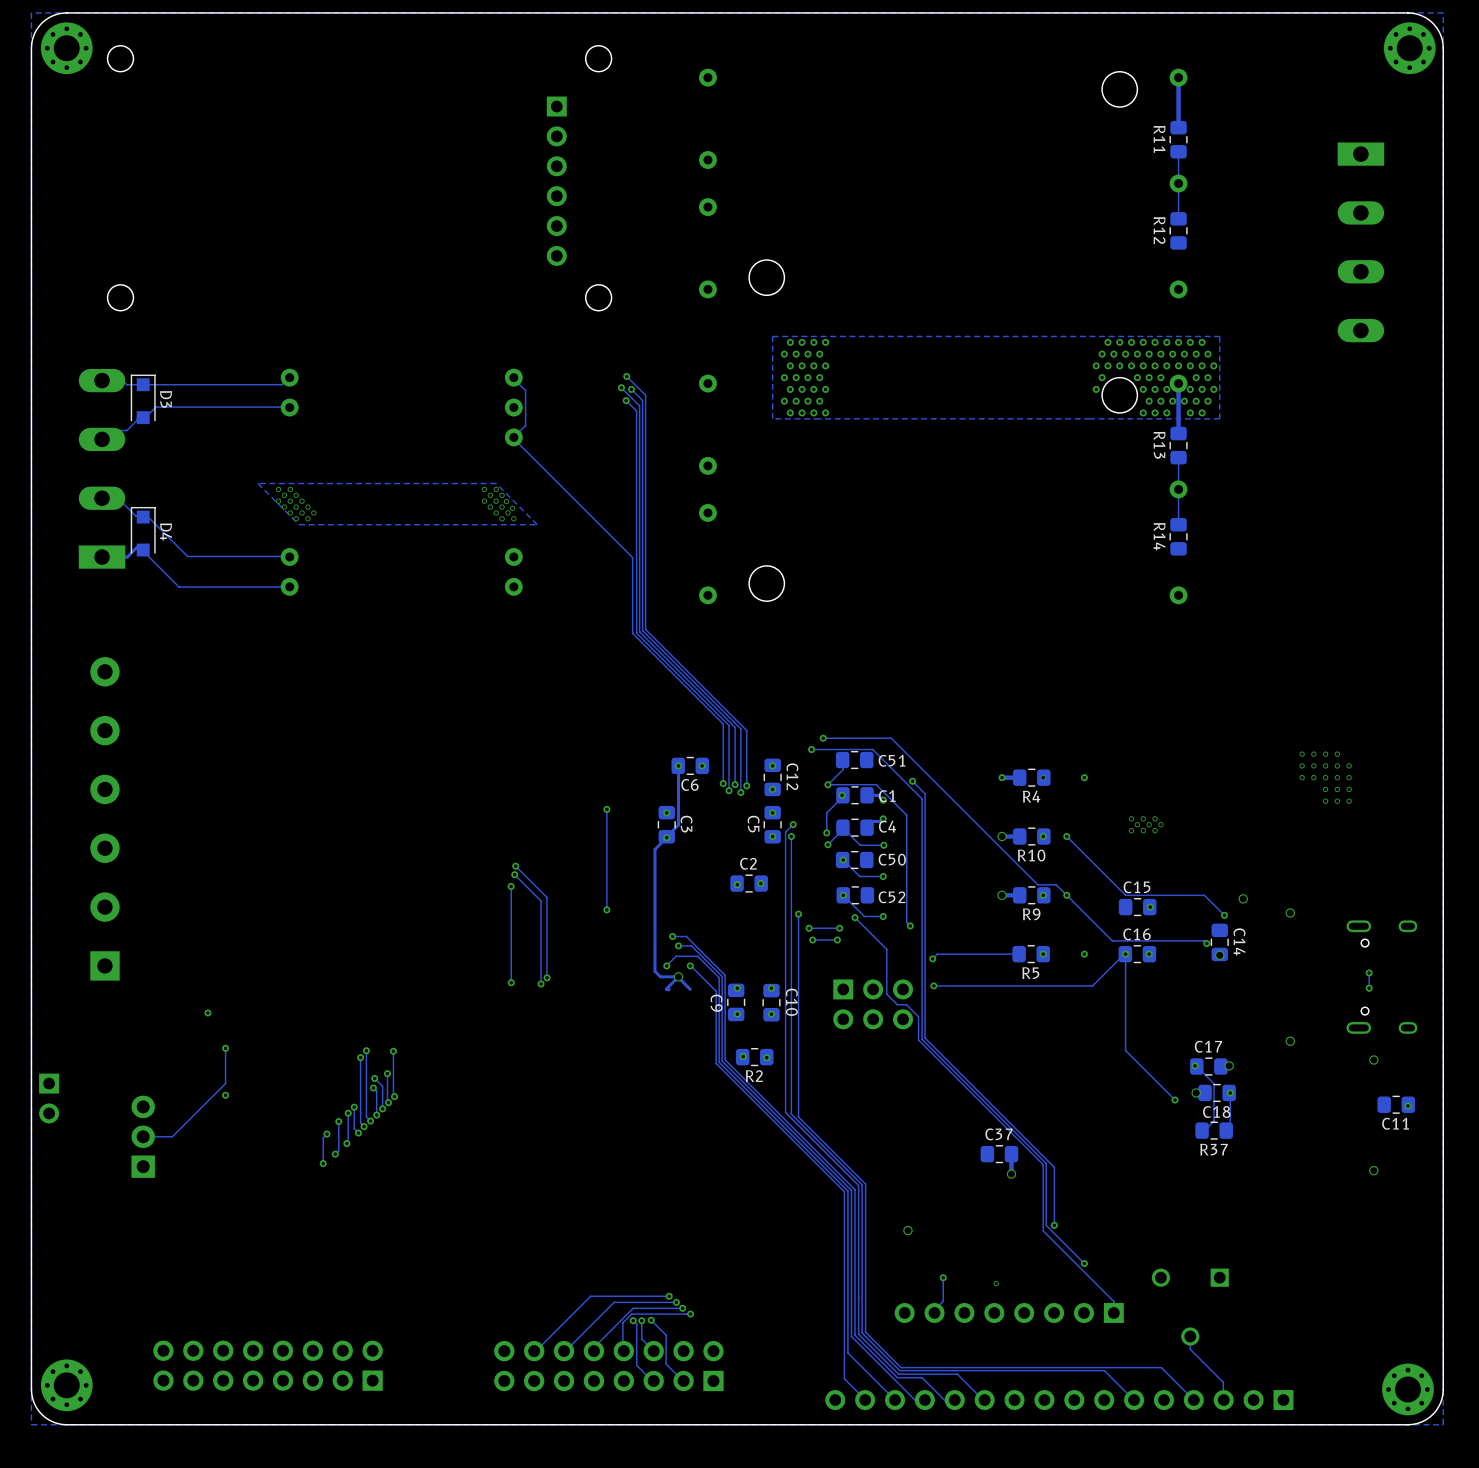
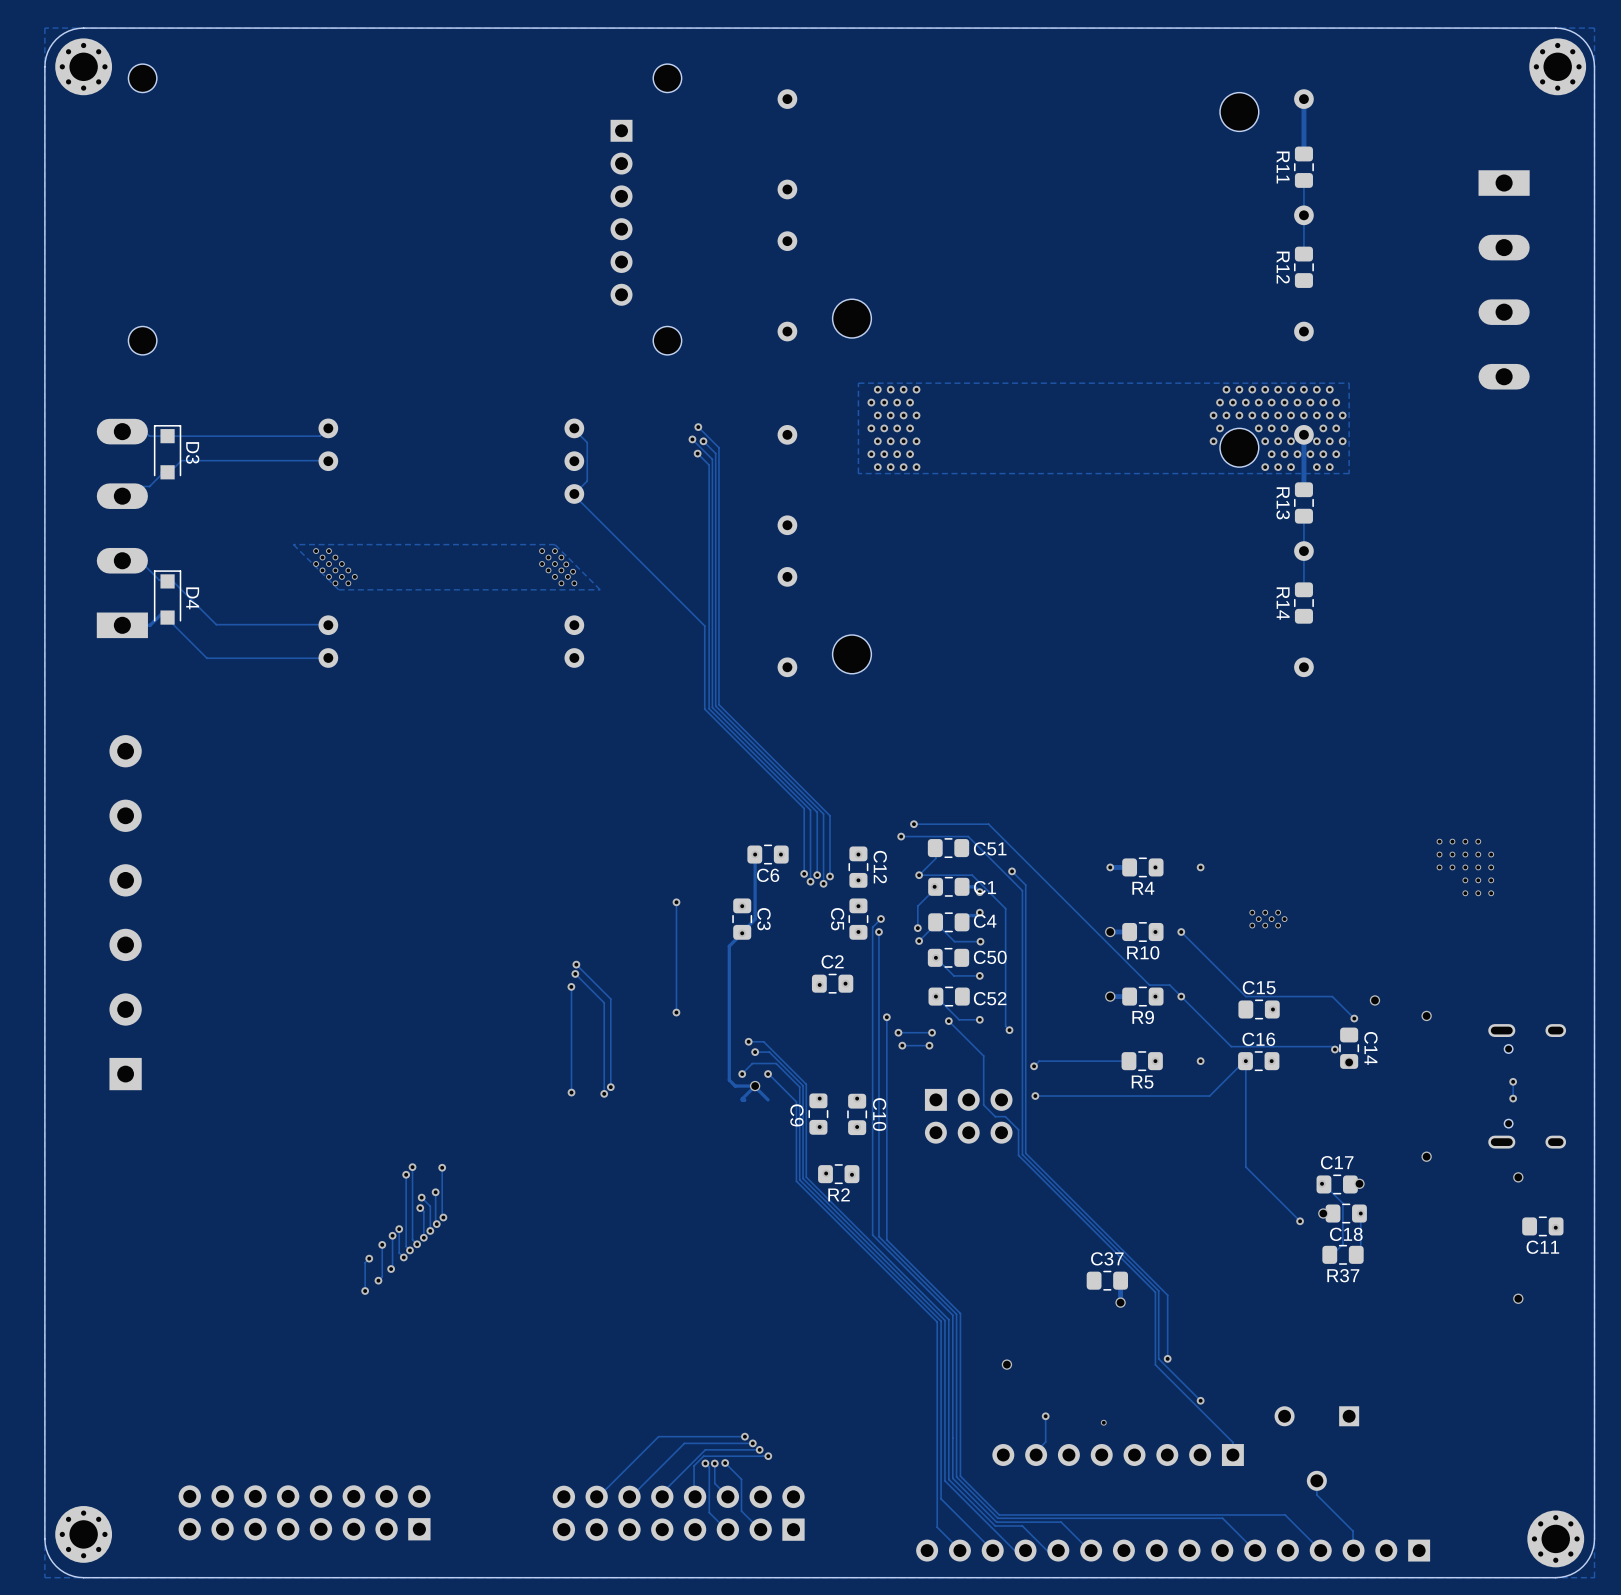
via: (207, 1012) -> none
track: (225, 1048) (225, 1083) (172, 1136) (143, 1136) -> none
via: (225, 1048) -> none
via: (225, 1095) -> none
part: (49, 1098) -> none
part: (143, 1136) -> none

